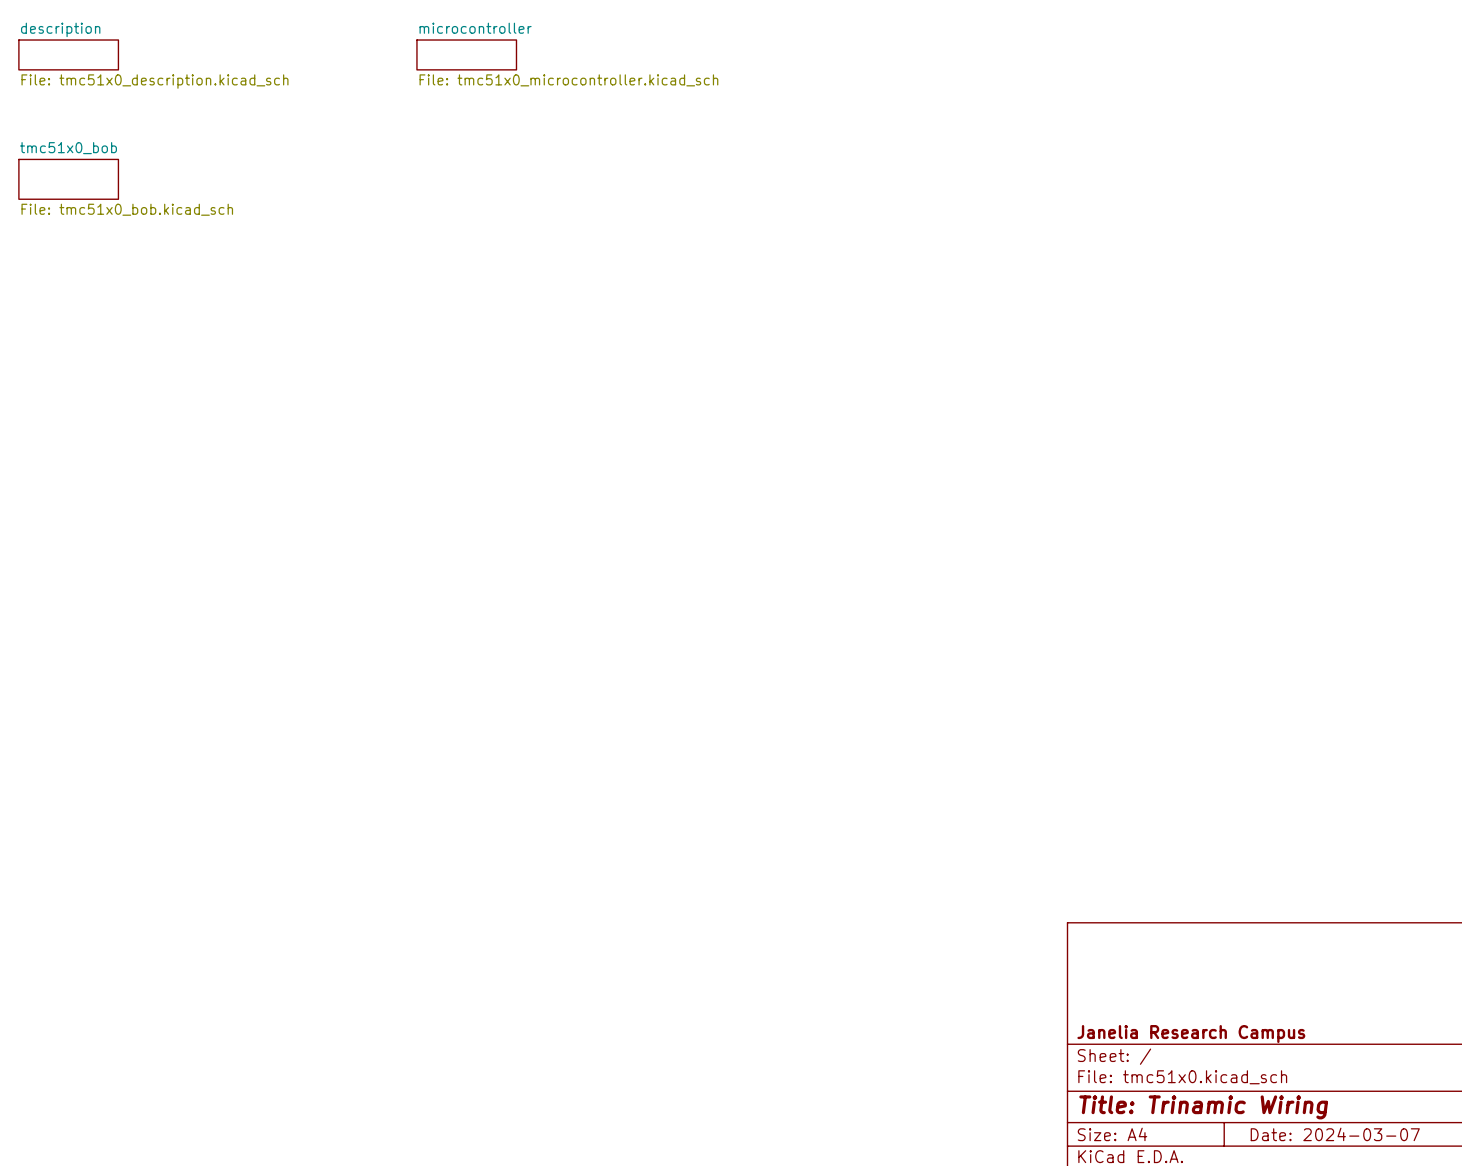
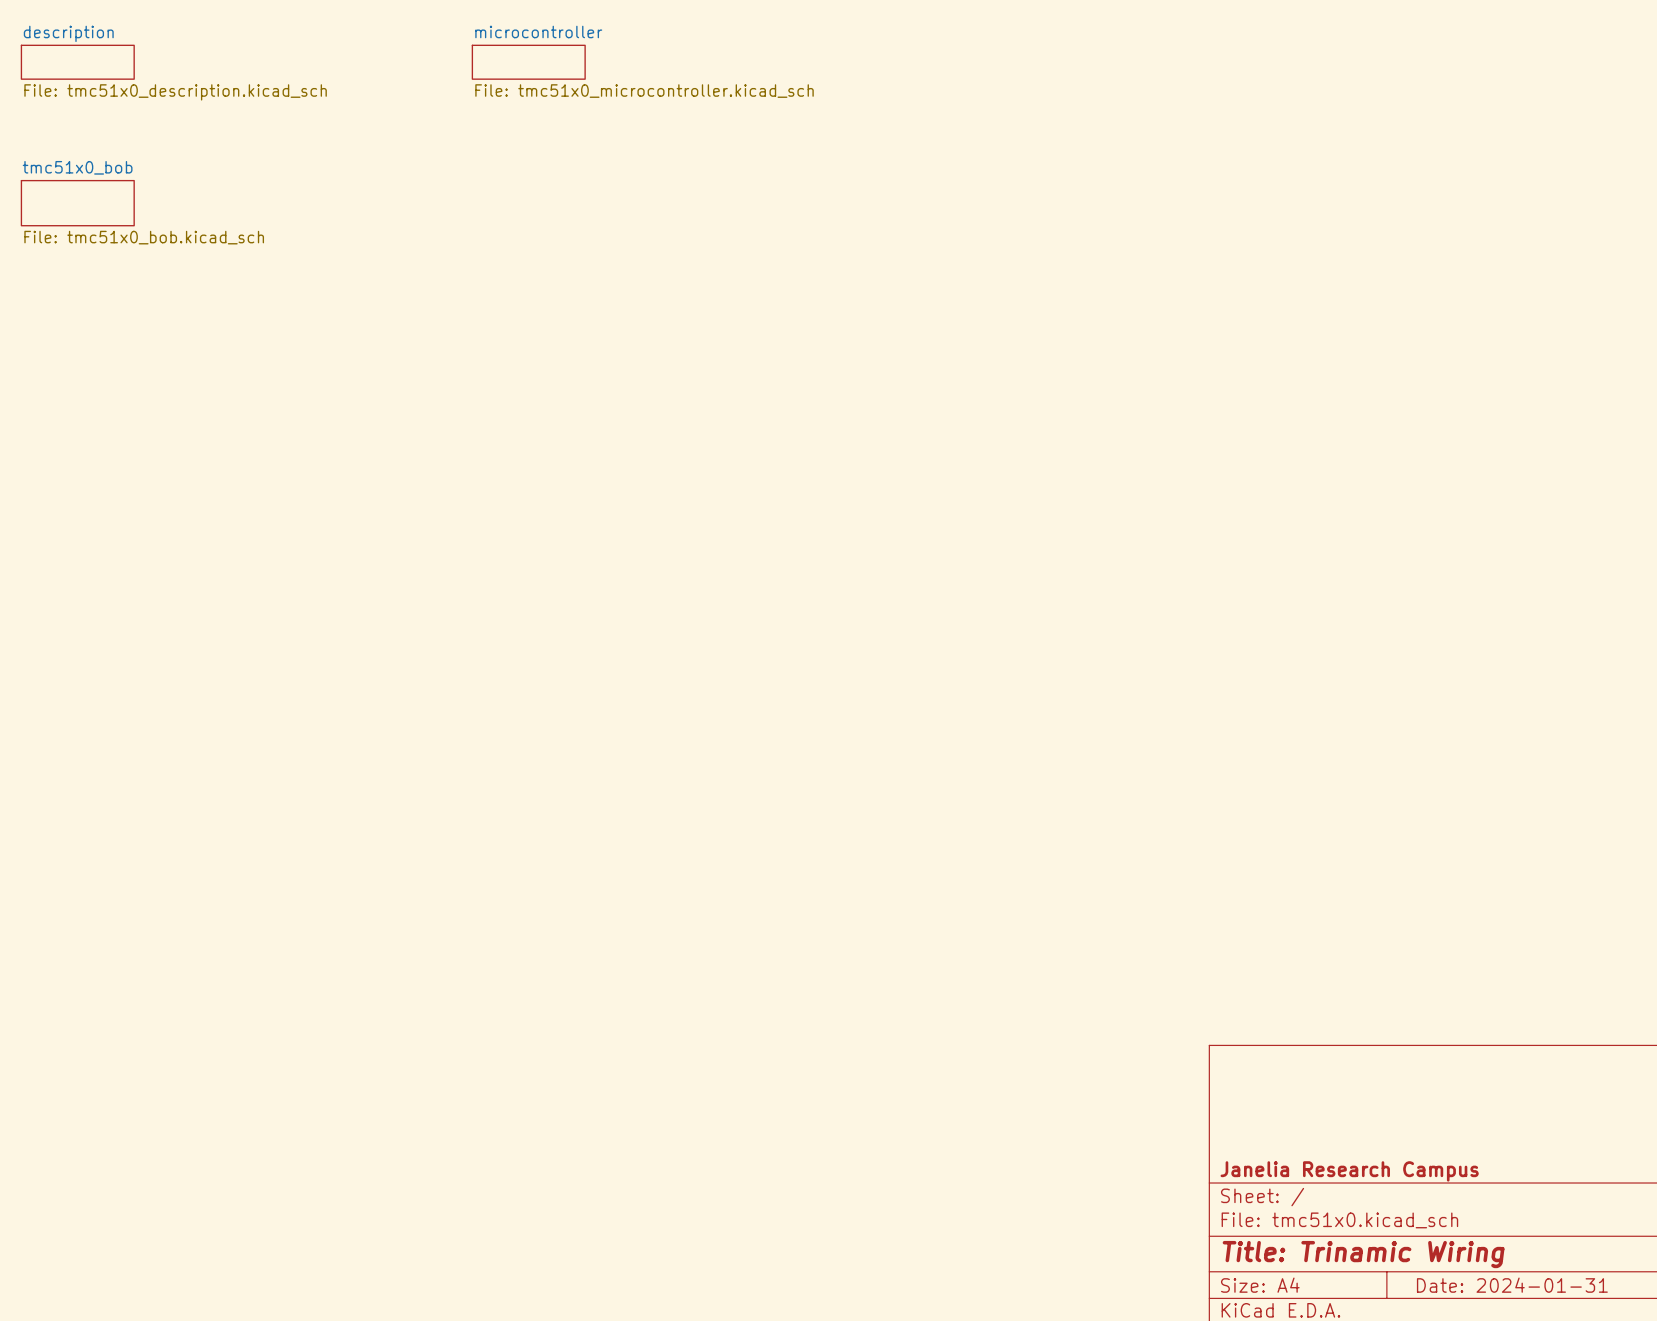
title block: Date: 2024-03-07 (1335, 1134) -> Date: 2024-01-31 (1512, 1285)

